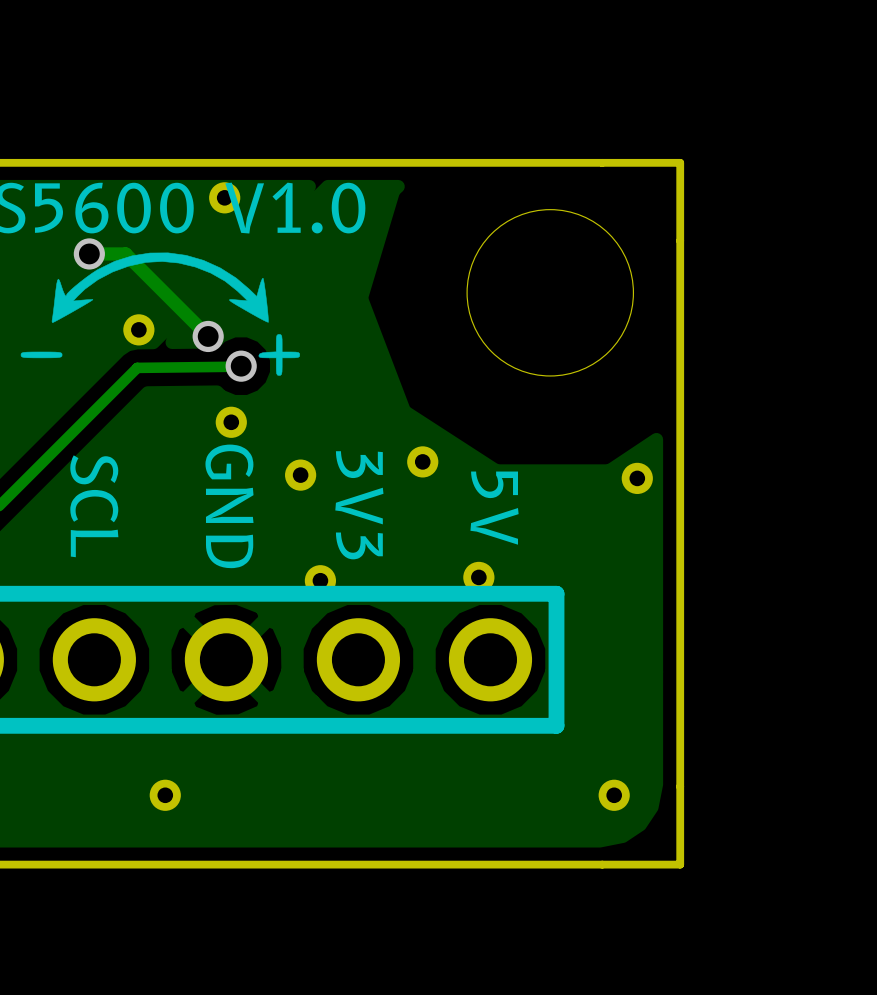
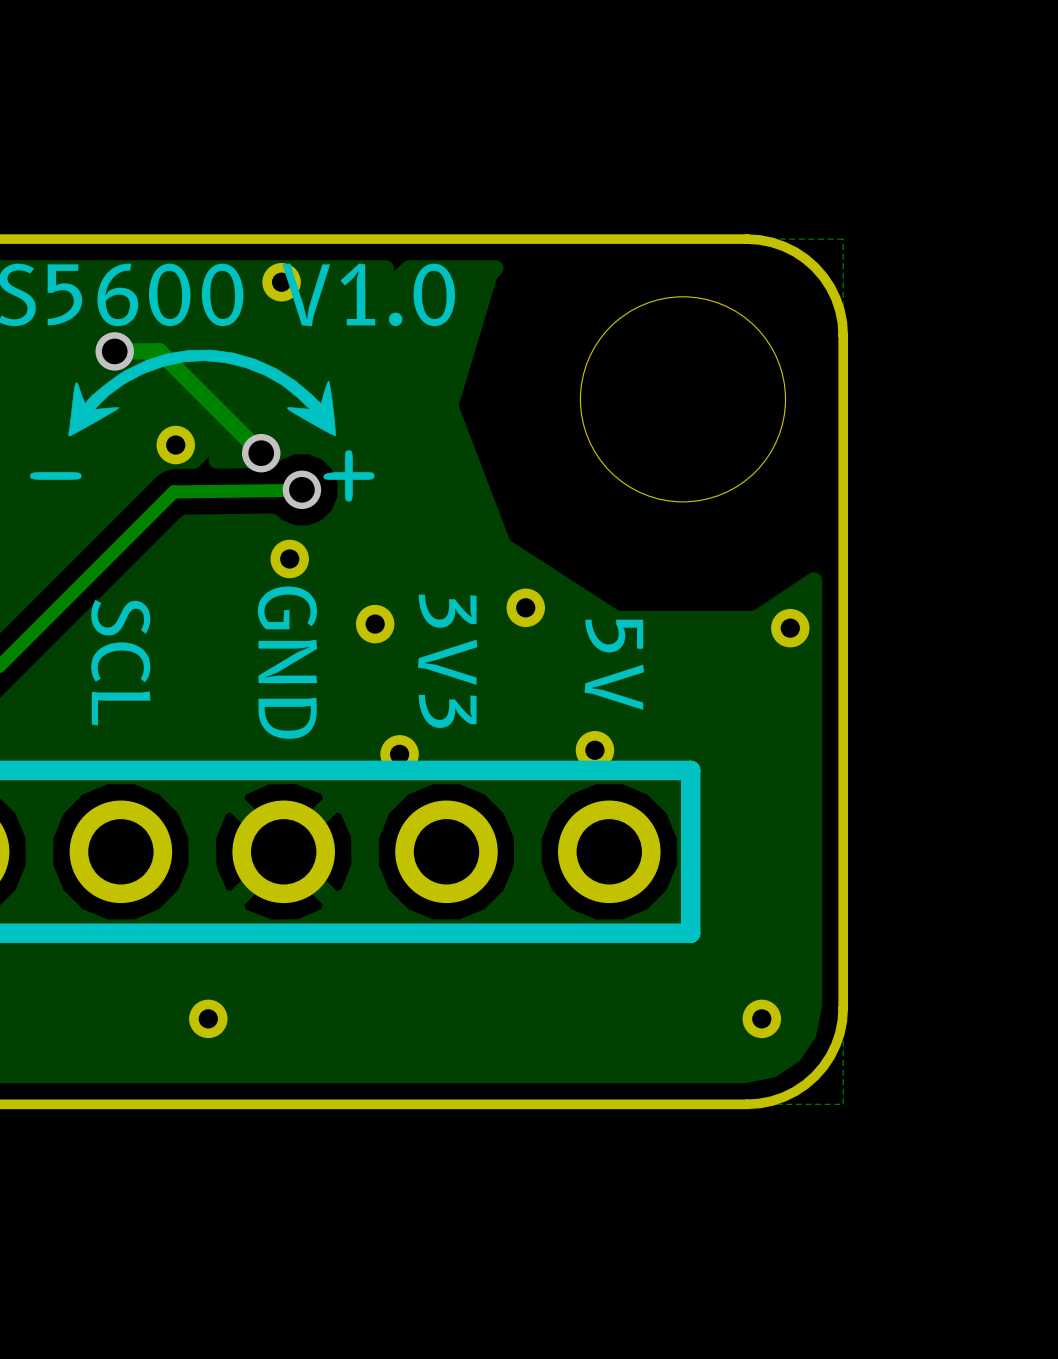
board edge: (602, 162) (680, 162) (680, 240) -> (747, 239) (759, 239) (783, 246) (805, 258) (815, 267) (823, 276) (835, 298) (839, 310) (843, 335)
board edge: (680, 786) (680, 864) (602, 864) -> (843, 1008) (839, 1033) (835, 1044) (823, 1066) (815, 1076) (805, 1084) (783, 1097) (759, 1103) (747, 1104)

